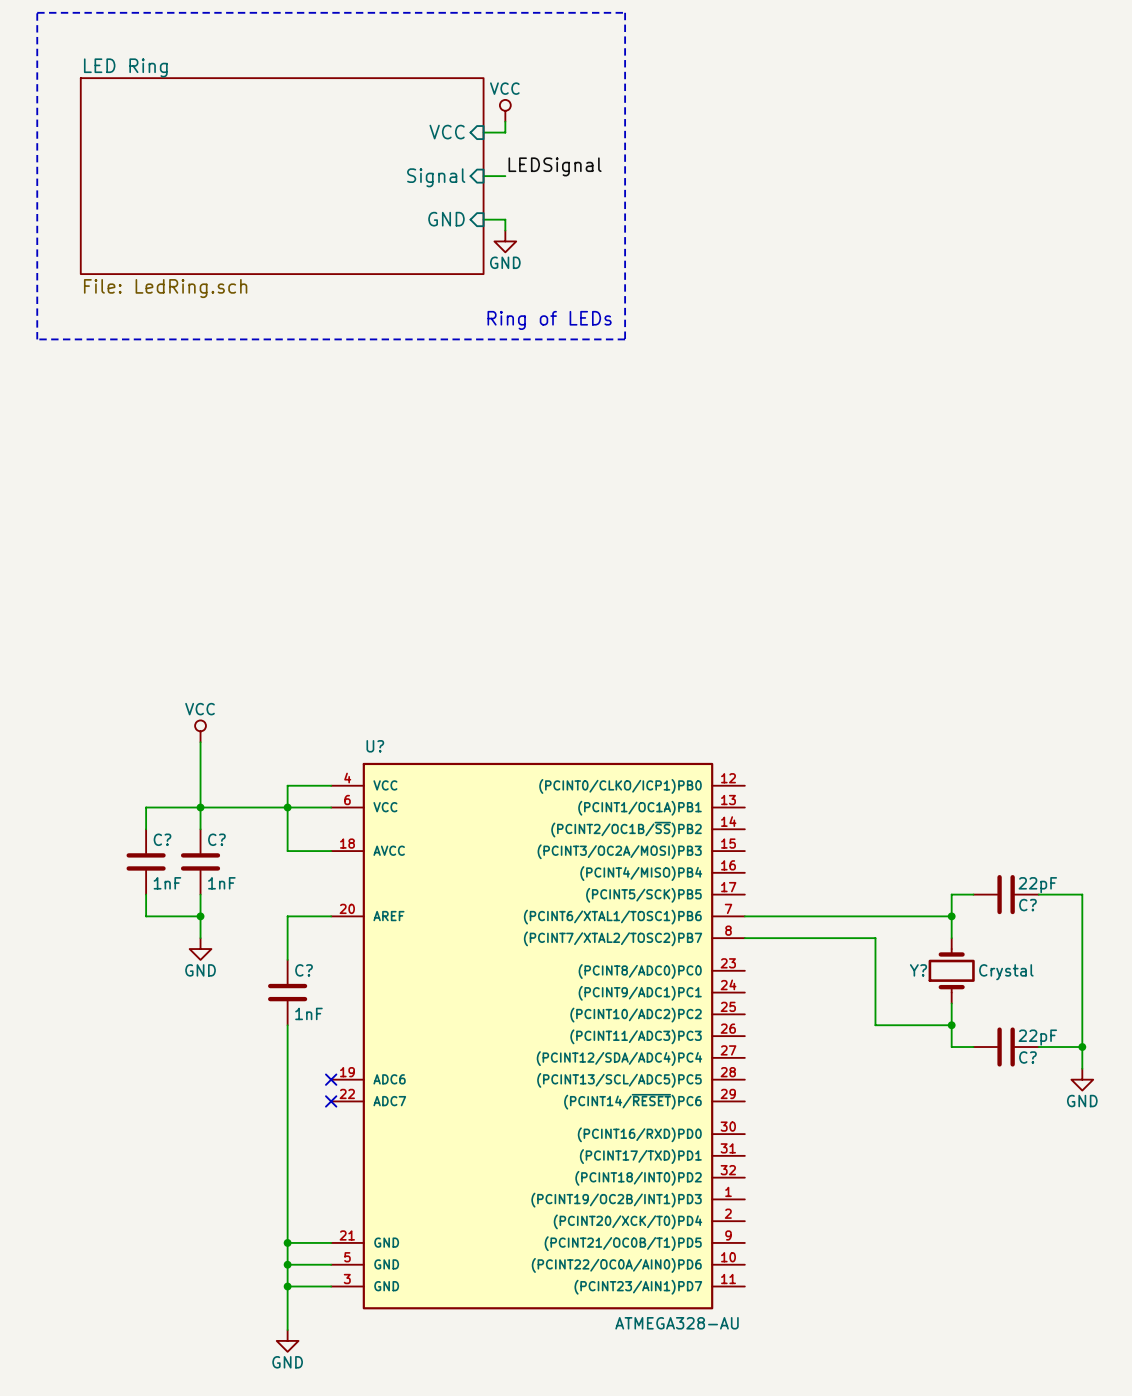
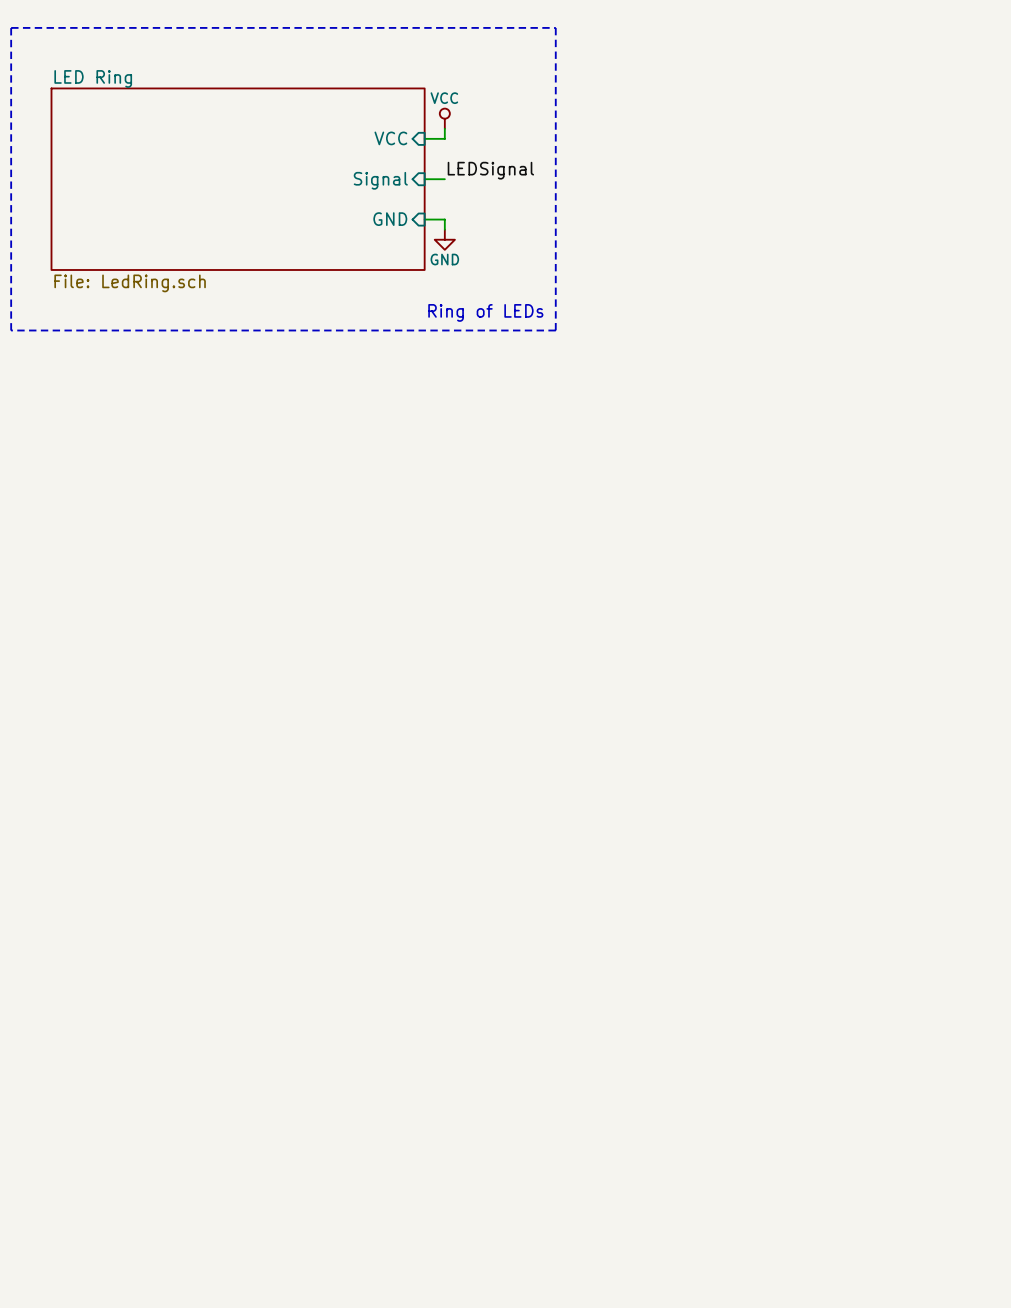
power symbol: VCC (200, 731) -> none
wire: (200, 742) (200, 829) -> none
wire: (331, 785) (287, 785) (287, 851) (331, 851) -> none
junction: (200, 807) -> none
junction: (287, 807) -> none
wire: (331, 807) (146, 807) (146, 829) -> none
C?: 1nF (146, 861) -> none
C?: 1nF (200, 861) -> none
wire: (146, 894) (146, 916) (200, 916) -> none
wire: (200, 894) (200, 938) -> none
wire: (973, 894) (951, 894) (951, 938) -> none
C?: 22pF (1006, 894) -> none
wire: (1038, 894) (1082, 894) (1082, 1068) -> none
junction: (200, 916) -> none
wire: (331, 916) (287, 916) (287, 959) -> none
wire: (744, 916) (951, 916) -> none
junction: (951, 916) -> none
wire: (744, 938) (875, 938) (875, 1025) (951, 1025) -> none
power symbol: GND (200, 949) -> none
Y?: Crystal (951, 970) -> none
C?: 1nF (287, 992) -> none
wire: (951, 1003) (951, 1047) (973, 1047) -> none
wire: (287, 1025) (287, 1330) -> none
junction: (951, 1025) -> none
U?: ATMEGA328-AU (538, 1036) -> none
C?: 22pF (1006, 1047) -> none
wire: (1038, 1047) (1082, 1047) -> none
junction: (1082, 1047) -> none
no-connect mark: (331, 1079) -> none
power symbol: GND (1082, 1079) -> none
no-connect mark: (331, 1101) -> none
wire: (287, 1242) (331, 1242) -> none
junction: (287, 1242) -> none
wire: (287, 1264) (331, 1264) -> none
junction: (287, 1264) -> none
wire: (287, 1286) (331, 1286) -> none
junction: (287, 1286) -> none
power symbol: GND (287, 1340) -> none

